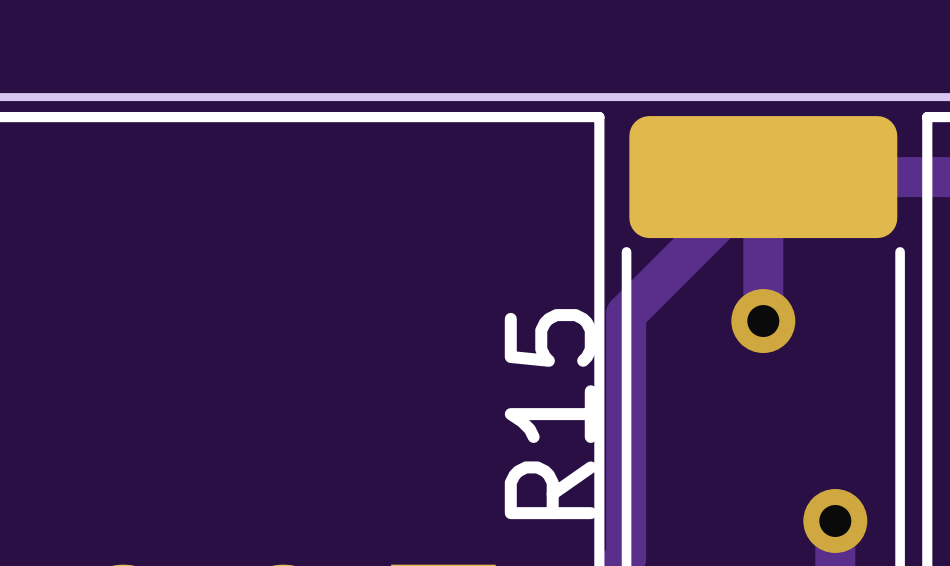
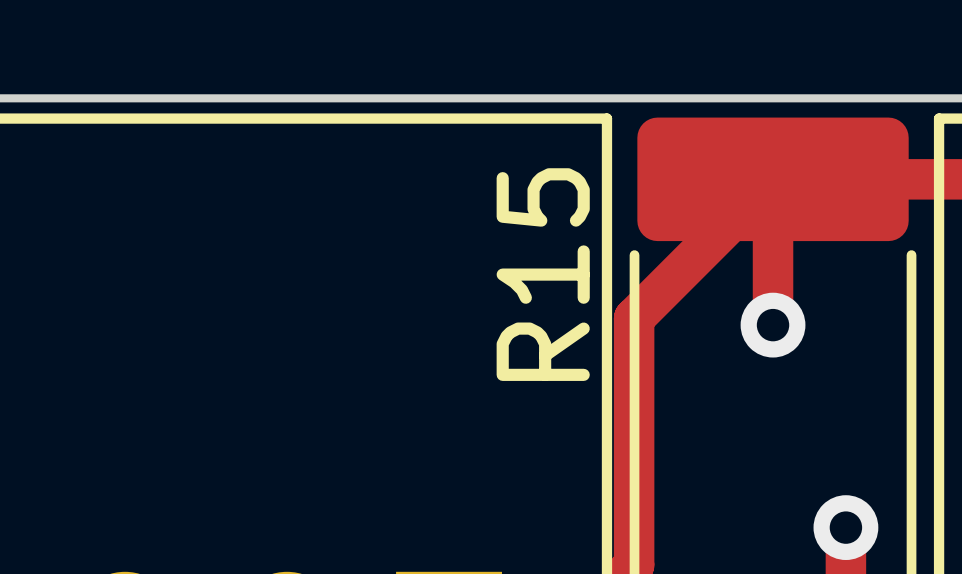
R15 name position: R15 (550, 414) -> R15 (543, 274)

